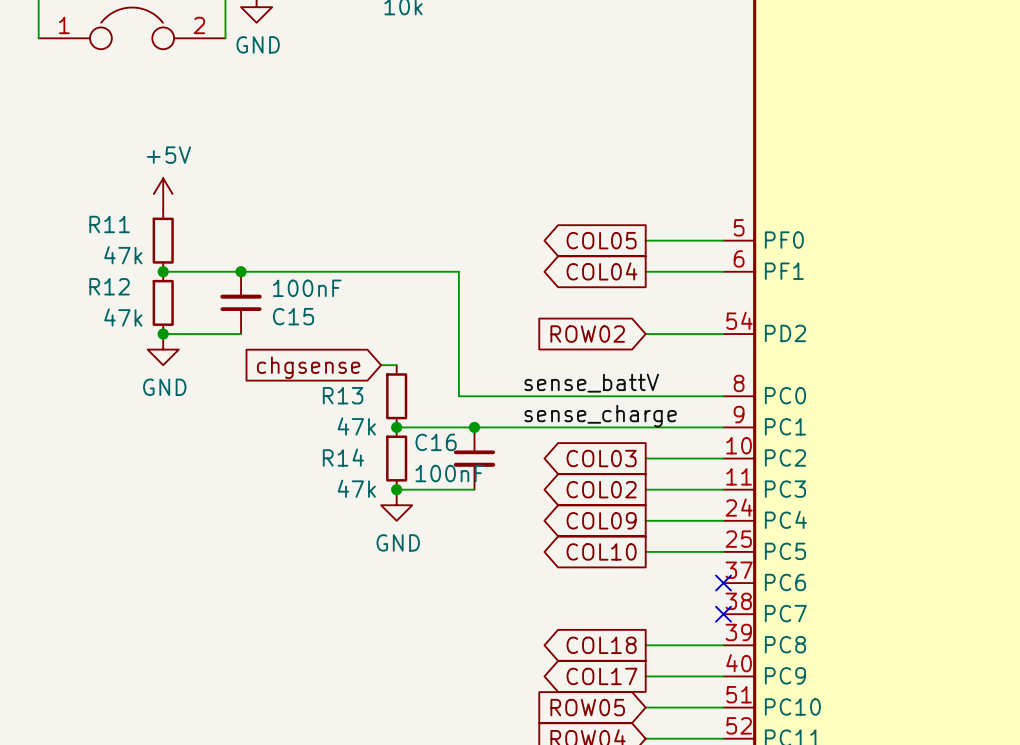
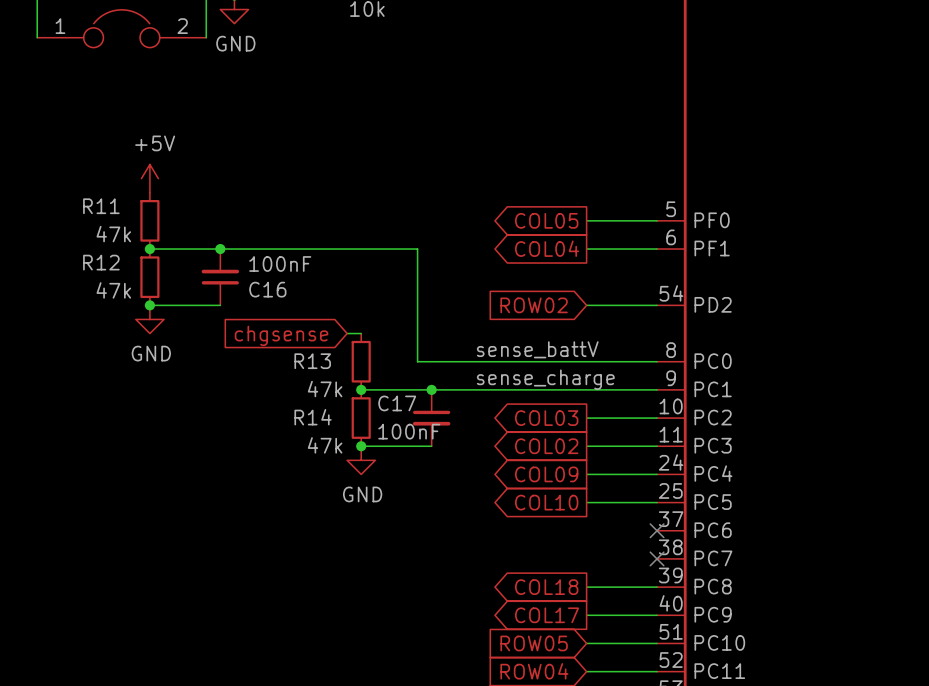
C15 name: C15 (293, 316) -> C16 (267, 289)
C16 name: C16 (436, 442) -> C17 (397, 403)

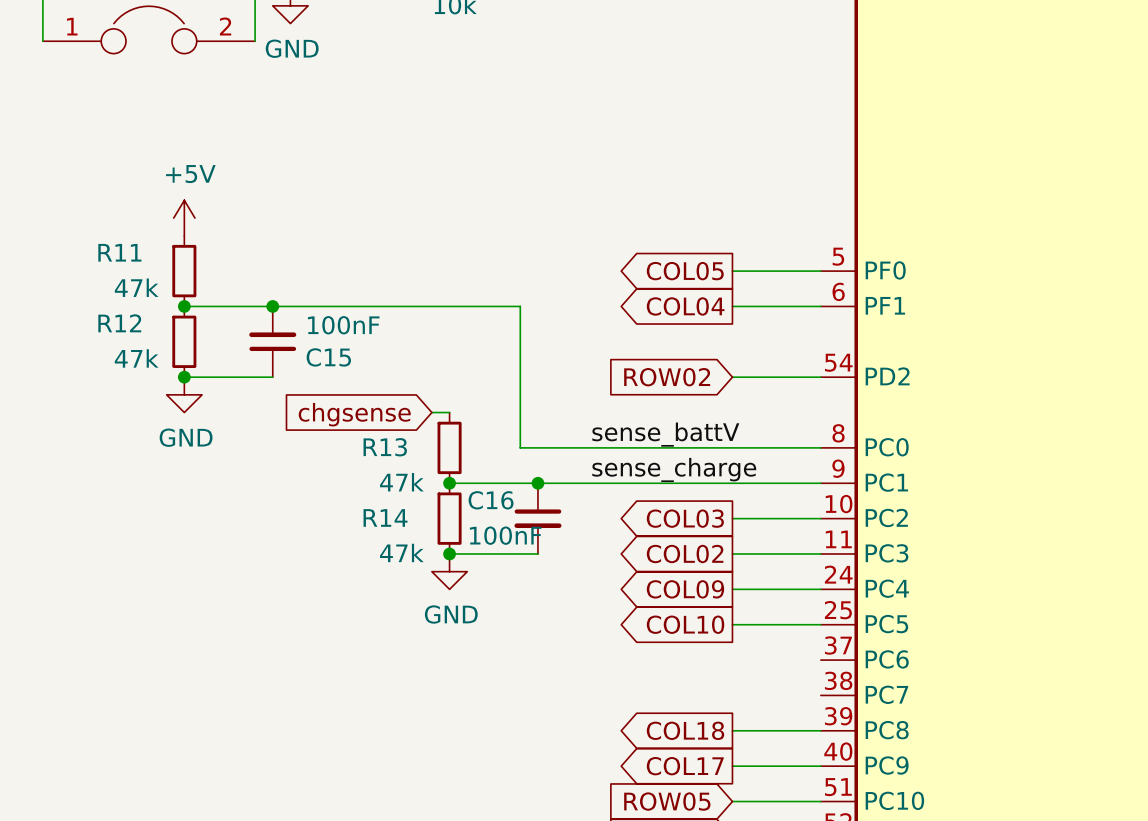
C16 name: C16 (267, 289) -> C15 (328, 357)
C17 name: C17 (397, 403) -> C16 (491, 500)
no-connect mark: (657, 530) -> none
no-connect mark: (657, 558) -> none

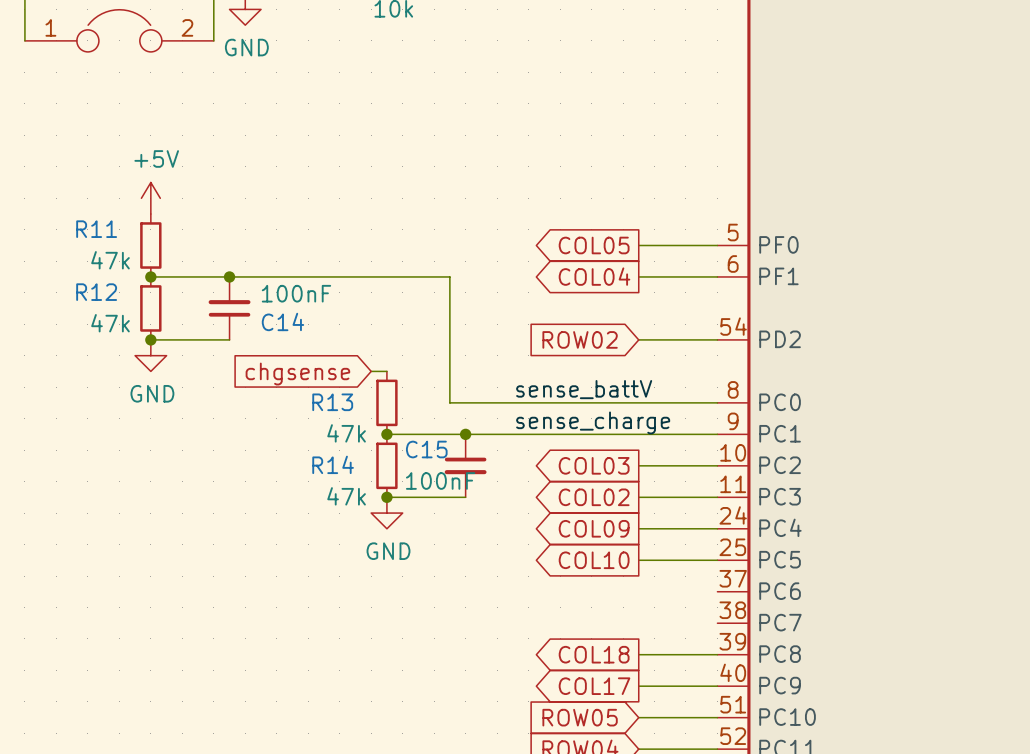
C15 name: C15 (328, 357) -> C14 (282, 321)
C16 name: C16 (491, 500) -> C15 (426, 449)

